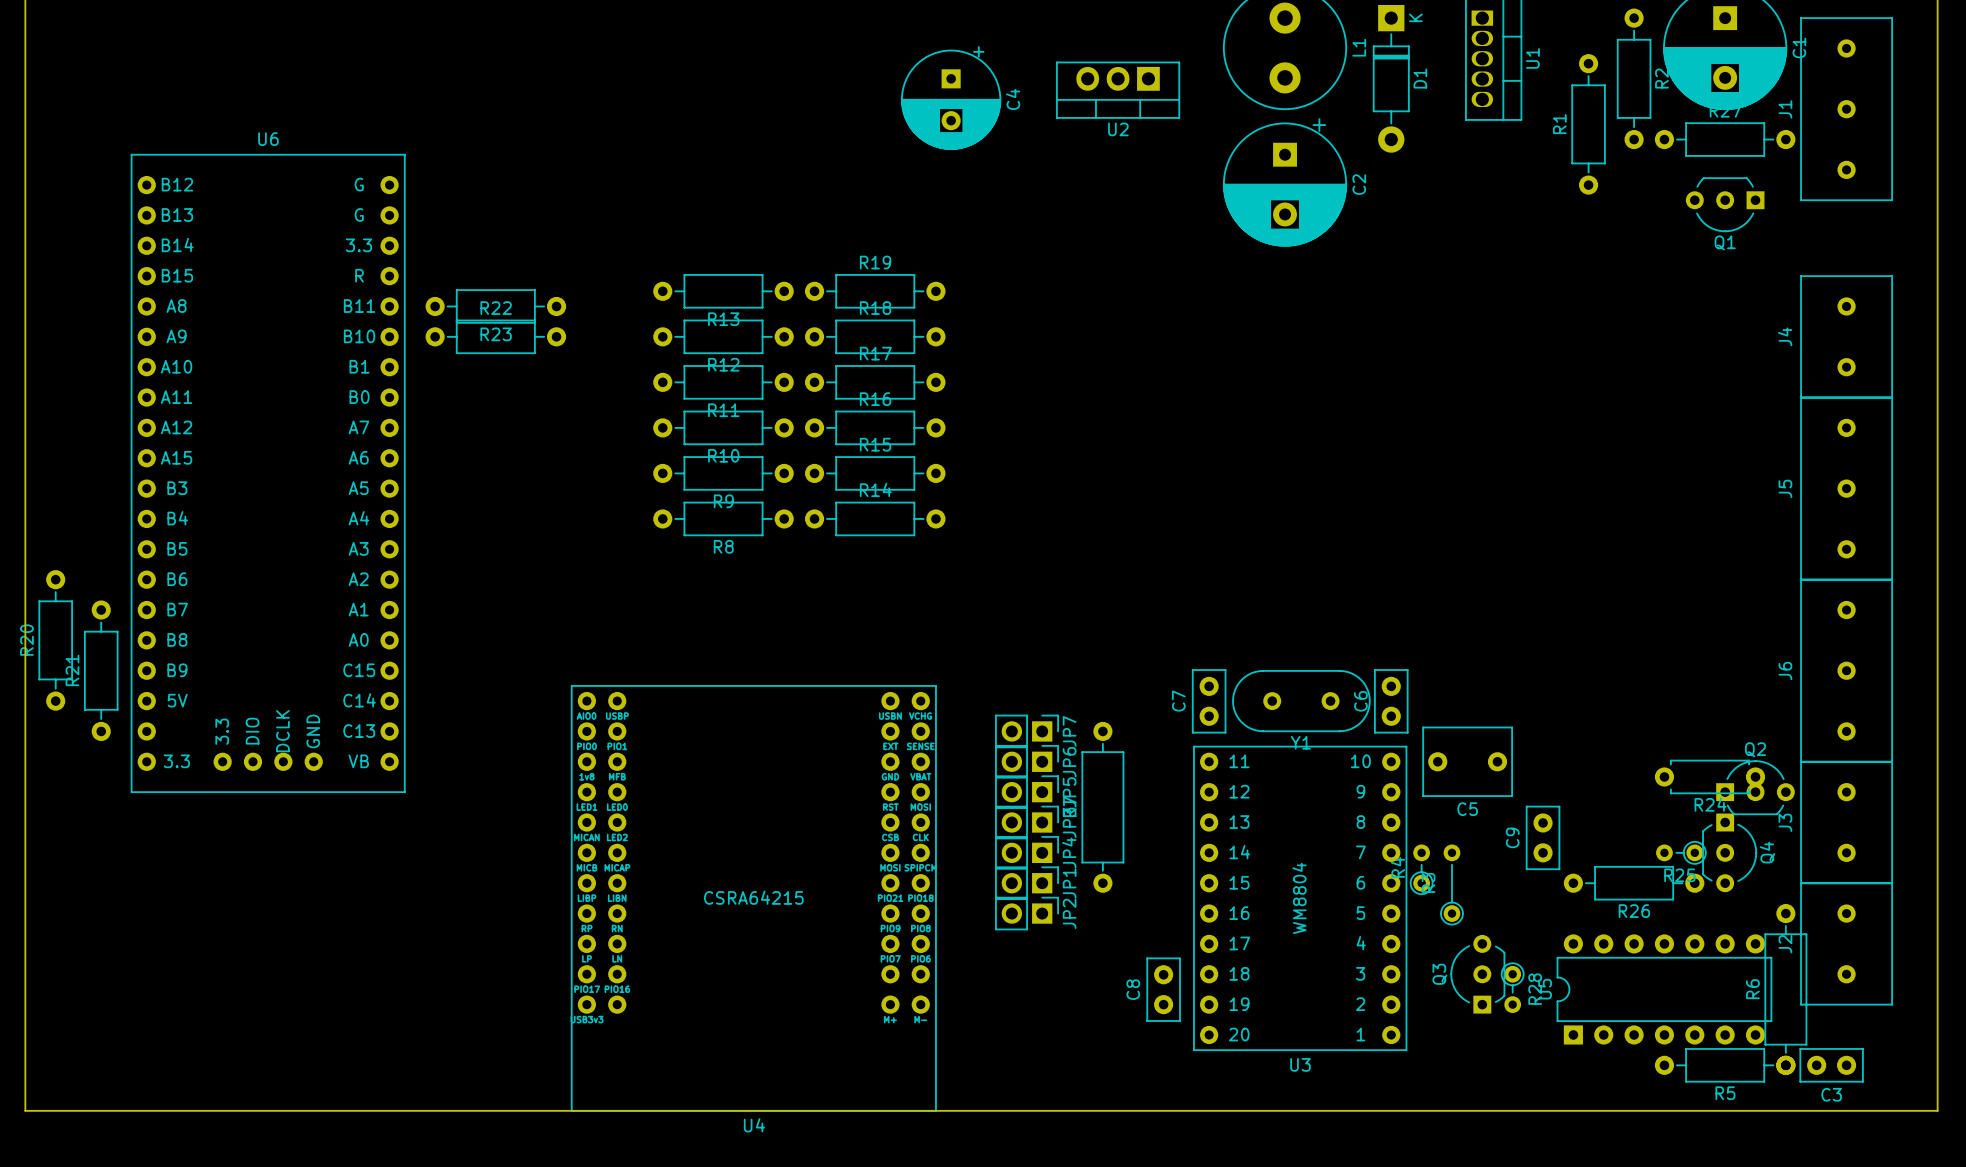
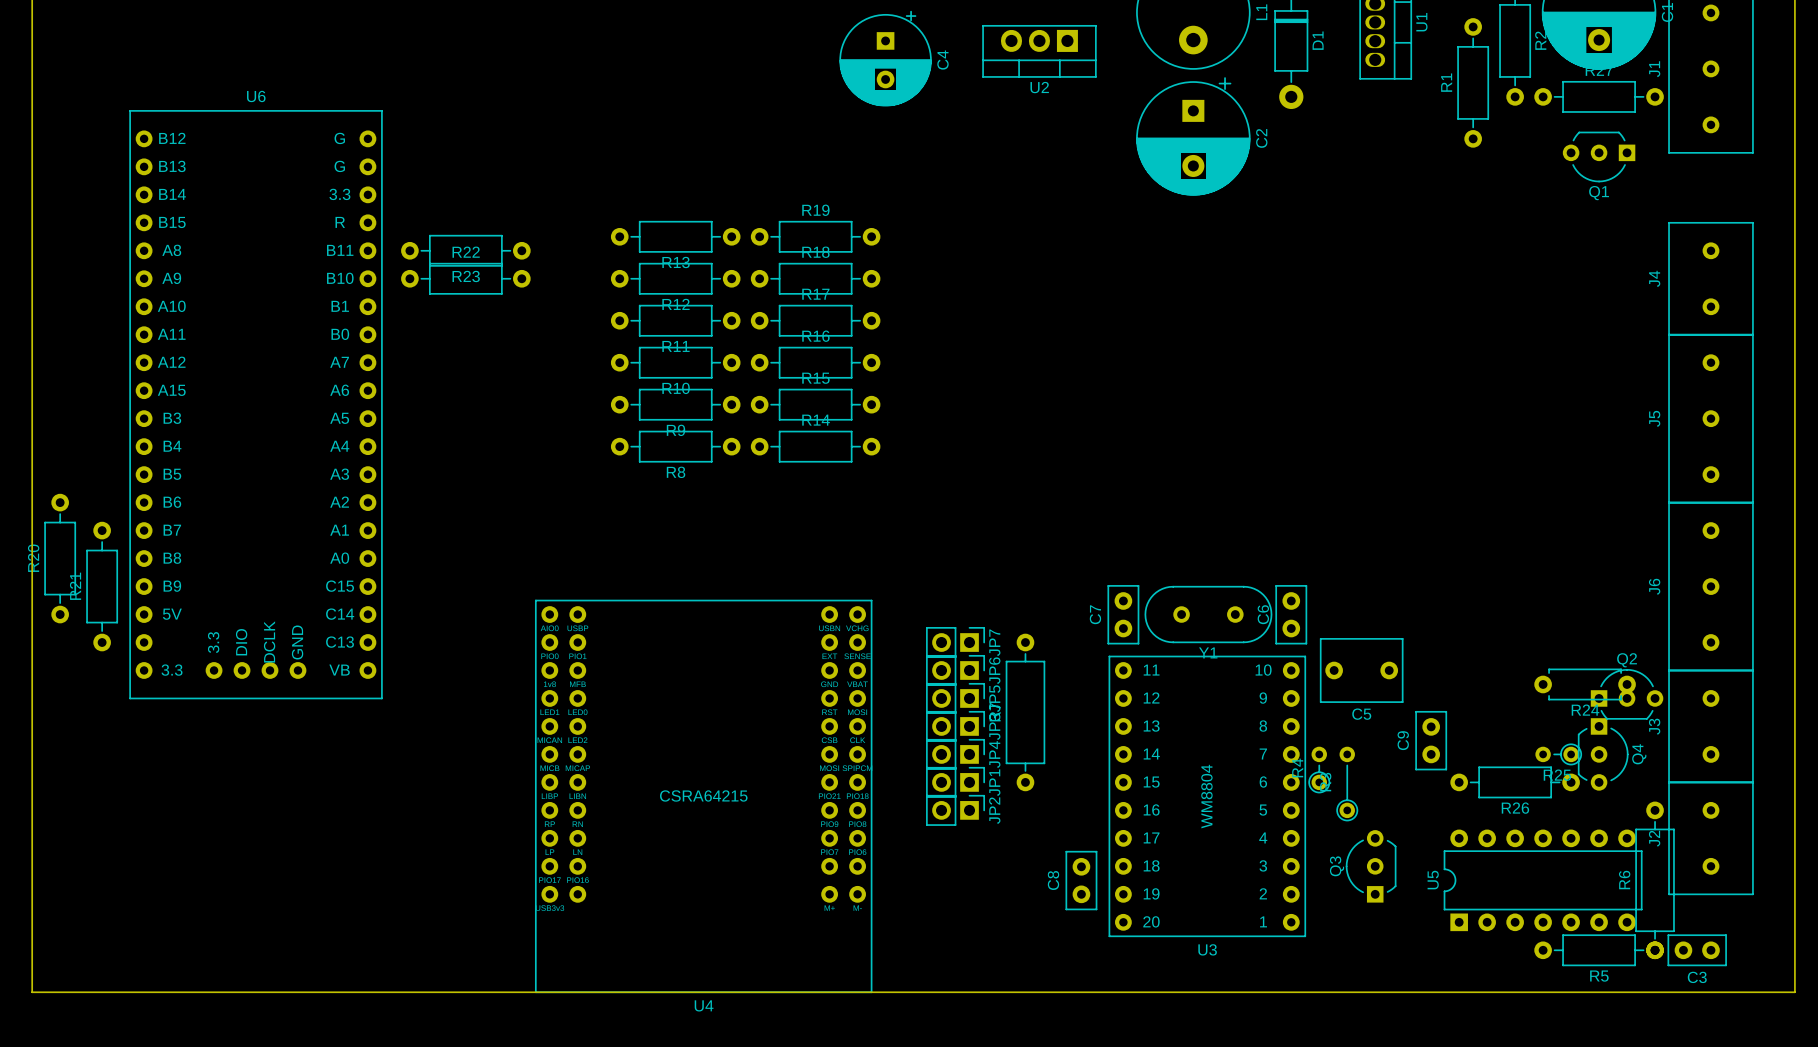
R28: (1512, 987) -> none

